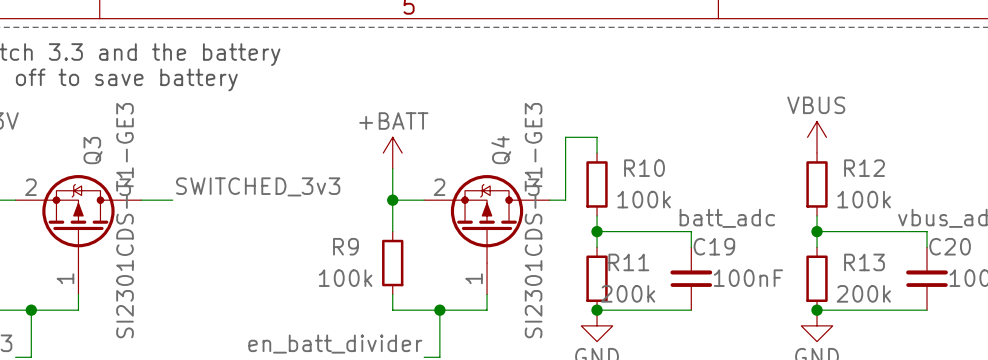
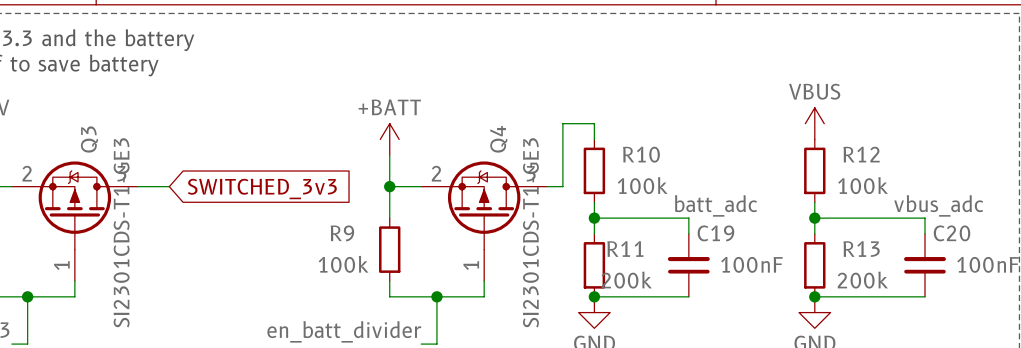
label: SWITCHED_3v3 (258, 186) -> none
global label: none -> SWITCHED_3v3 (262, 189)

